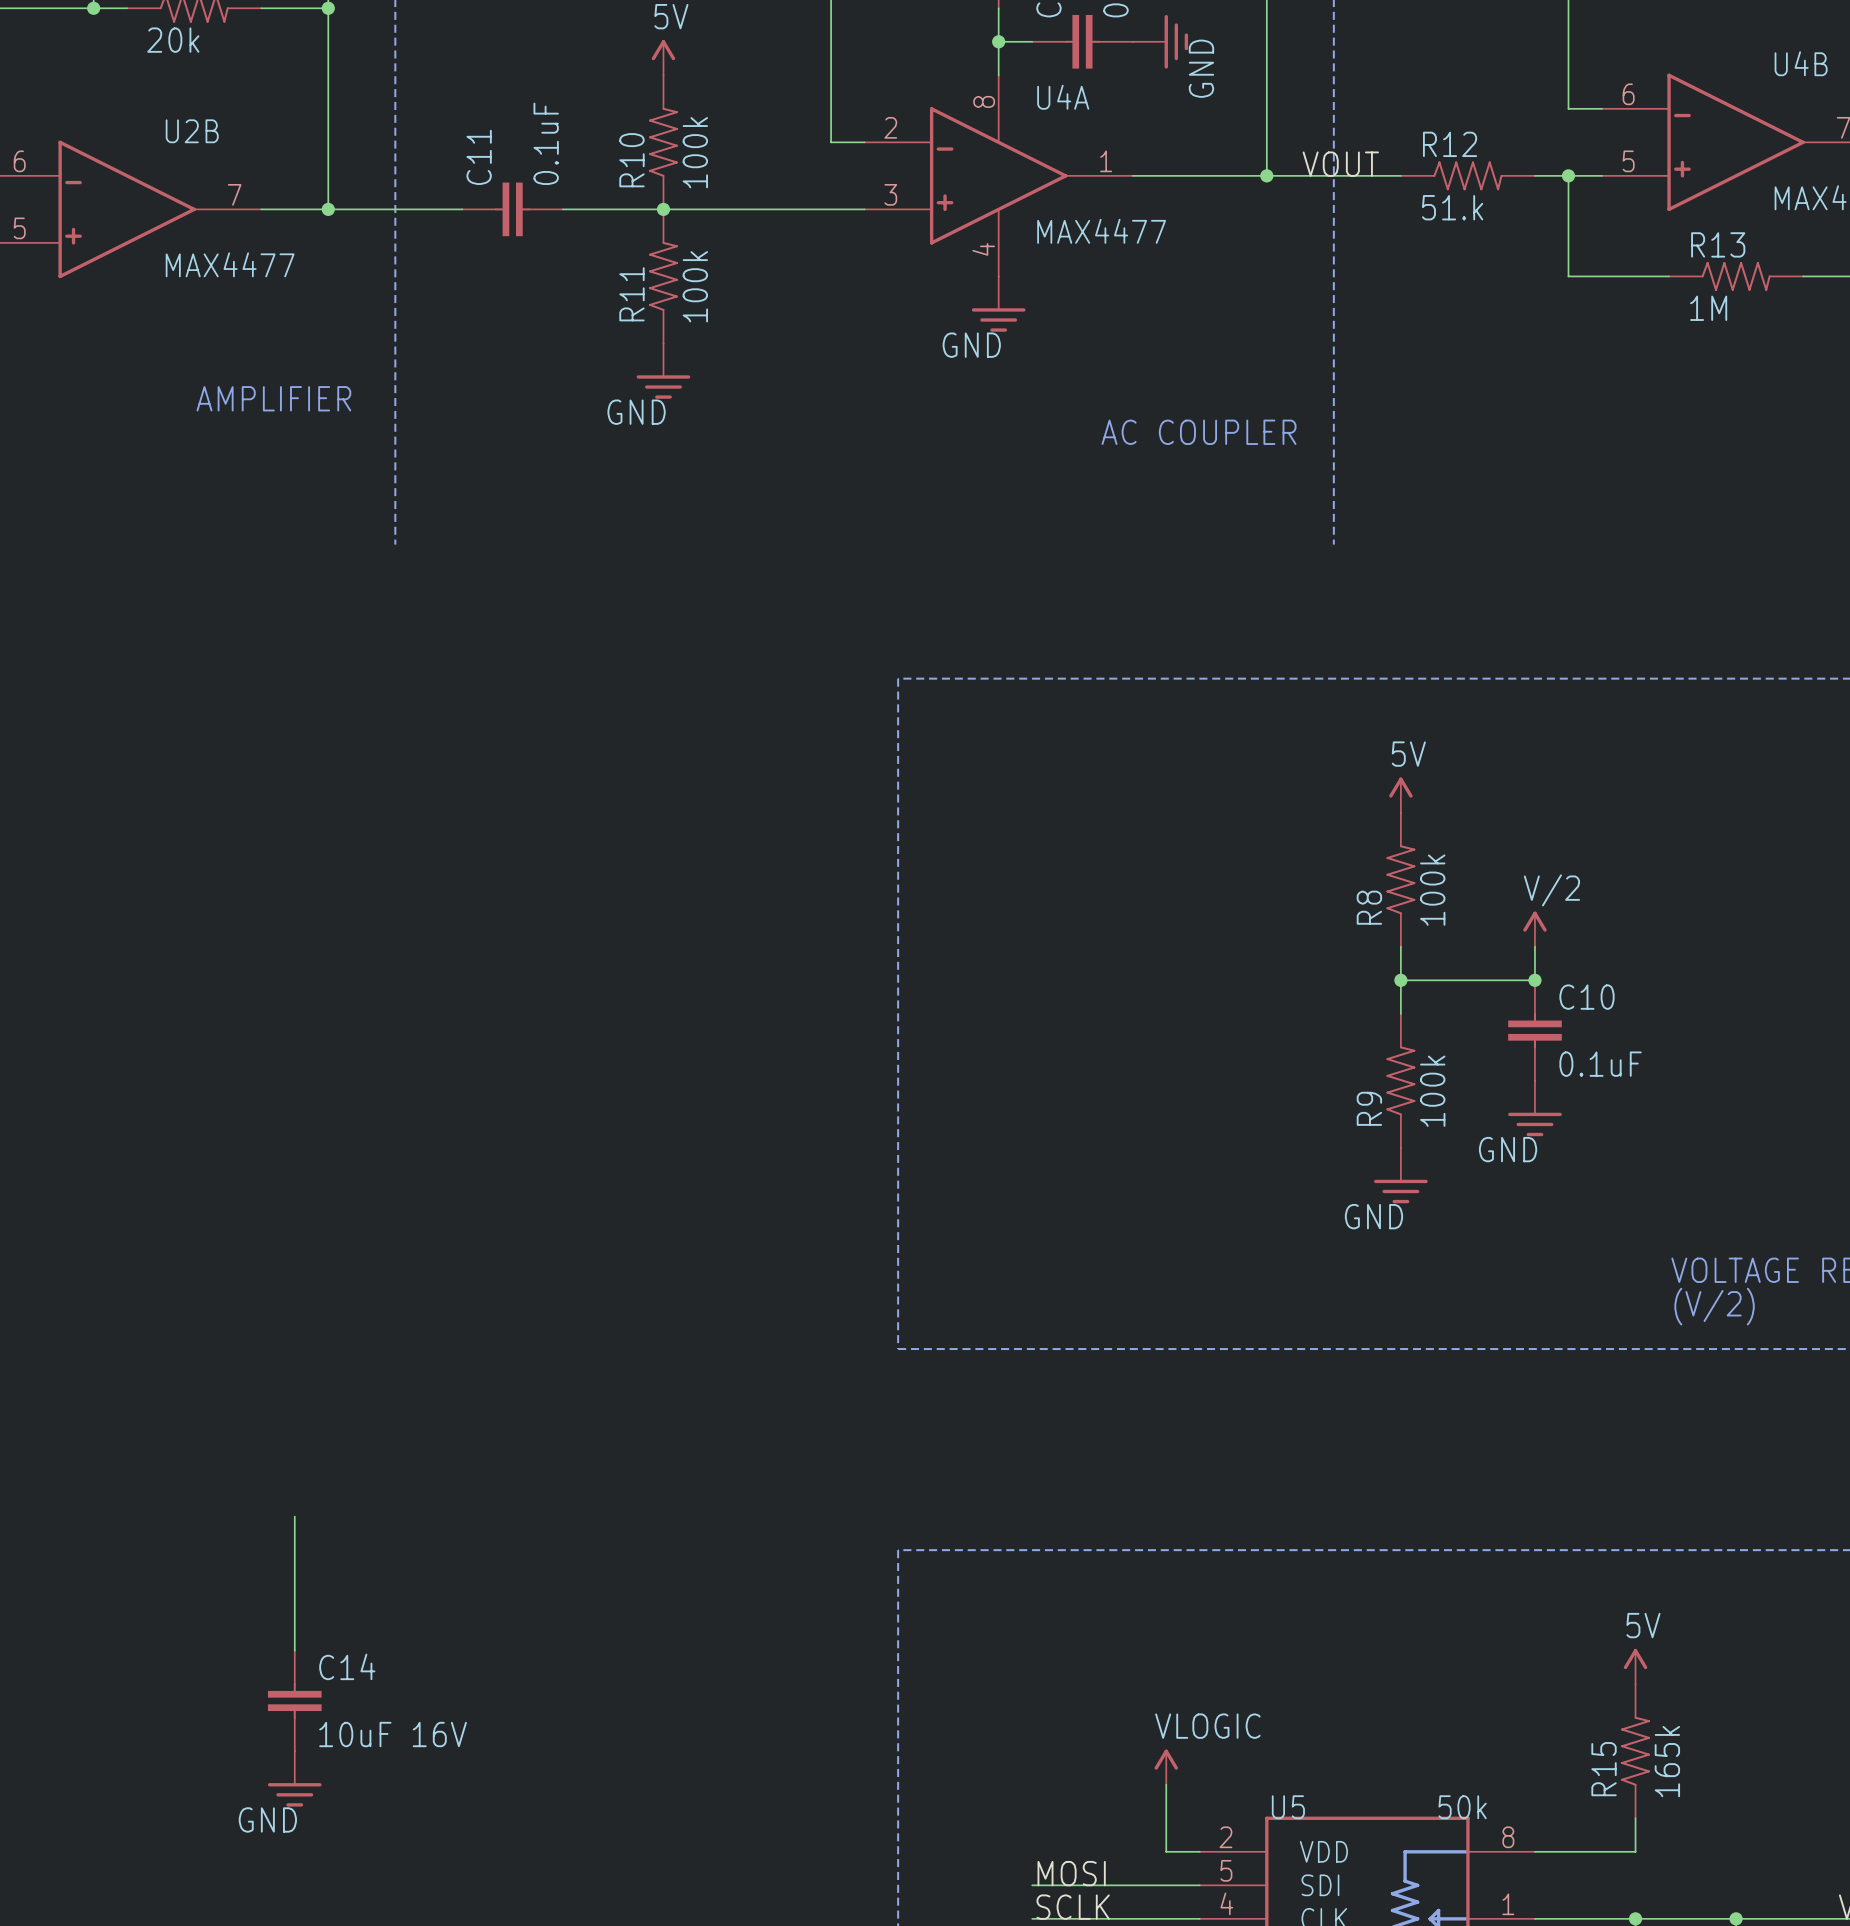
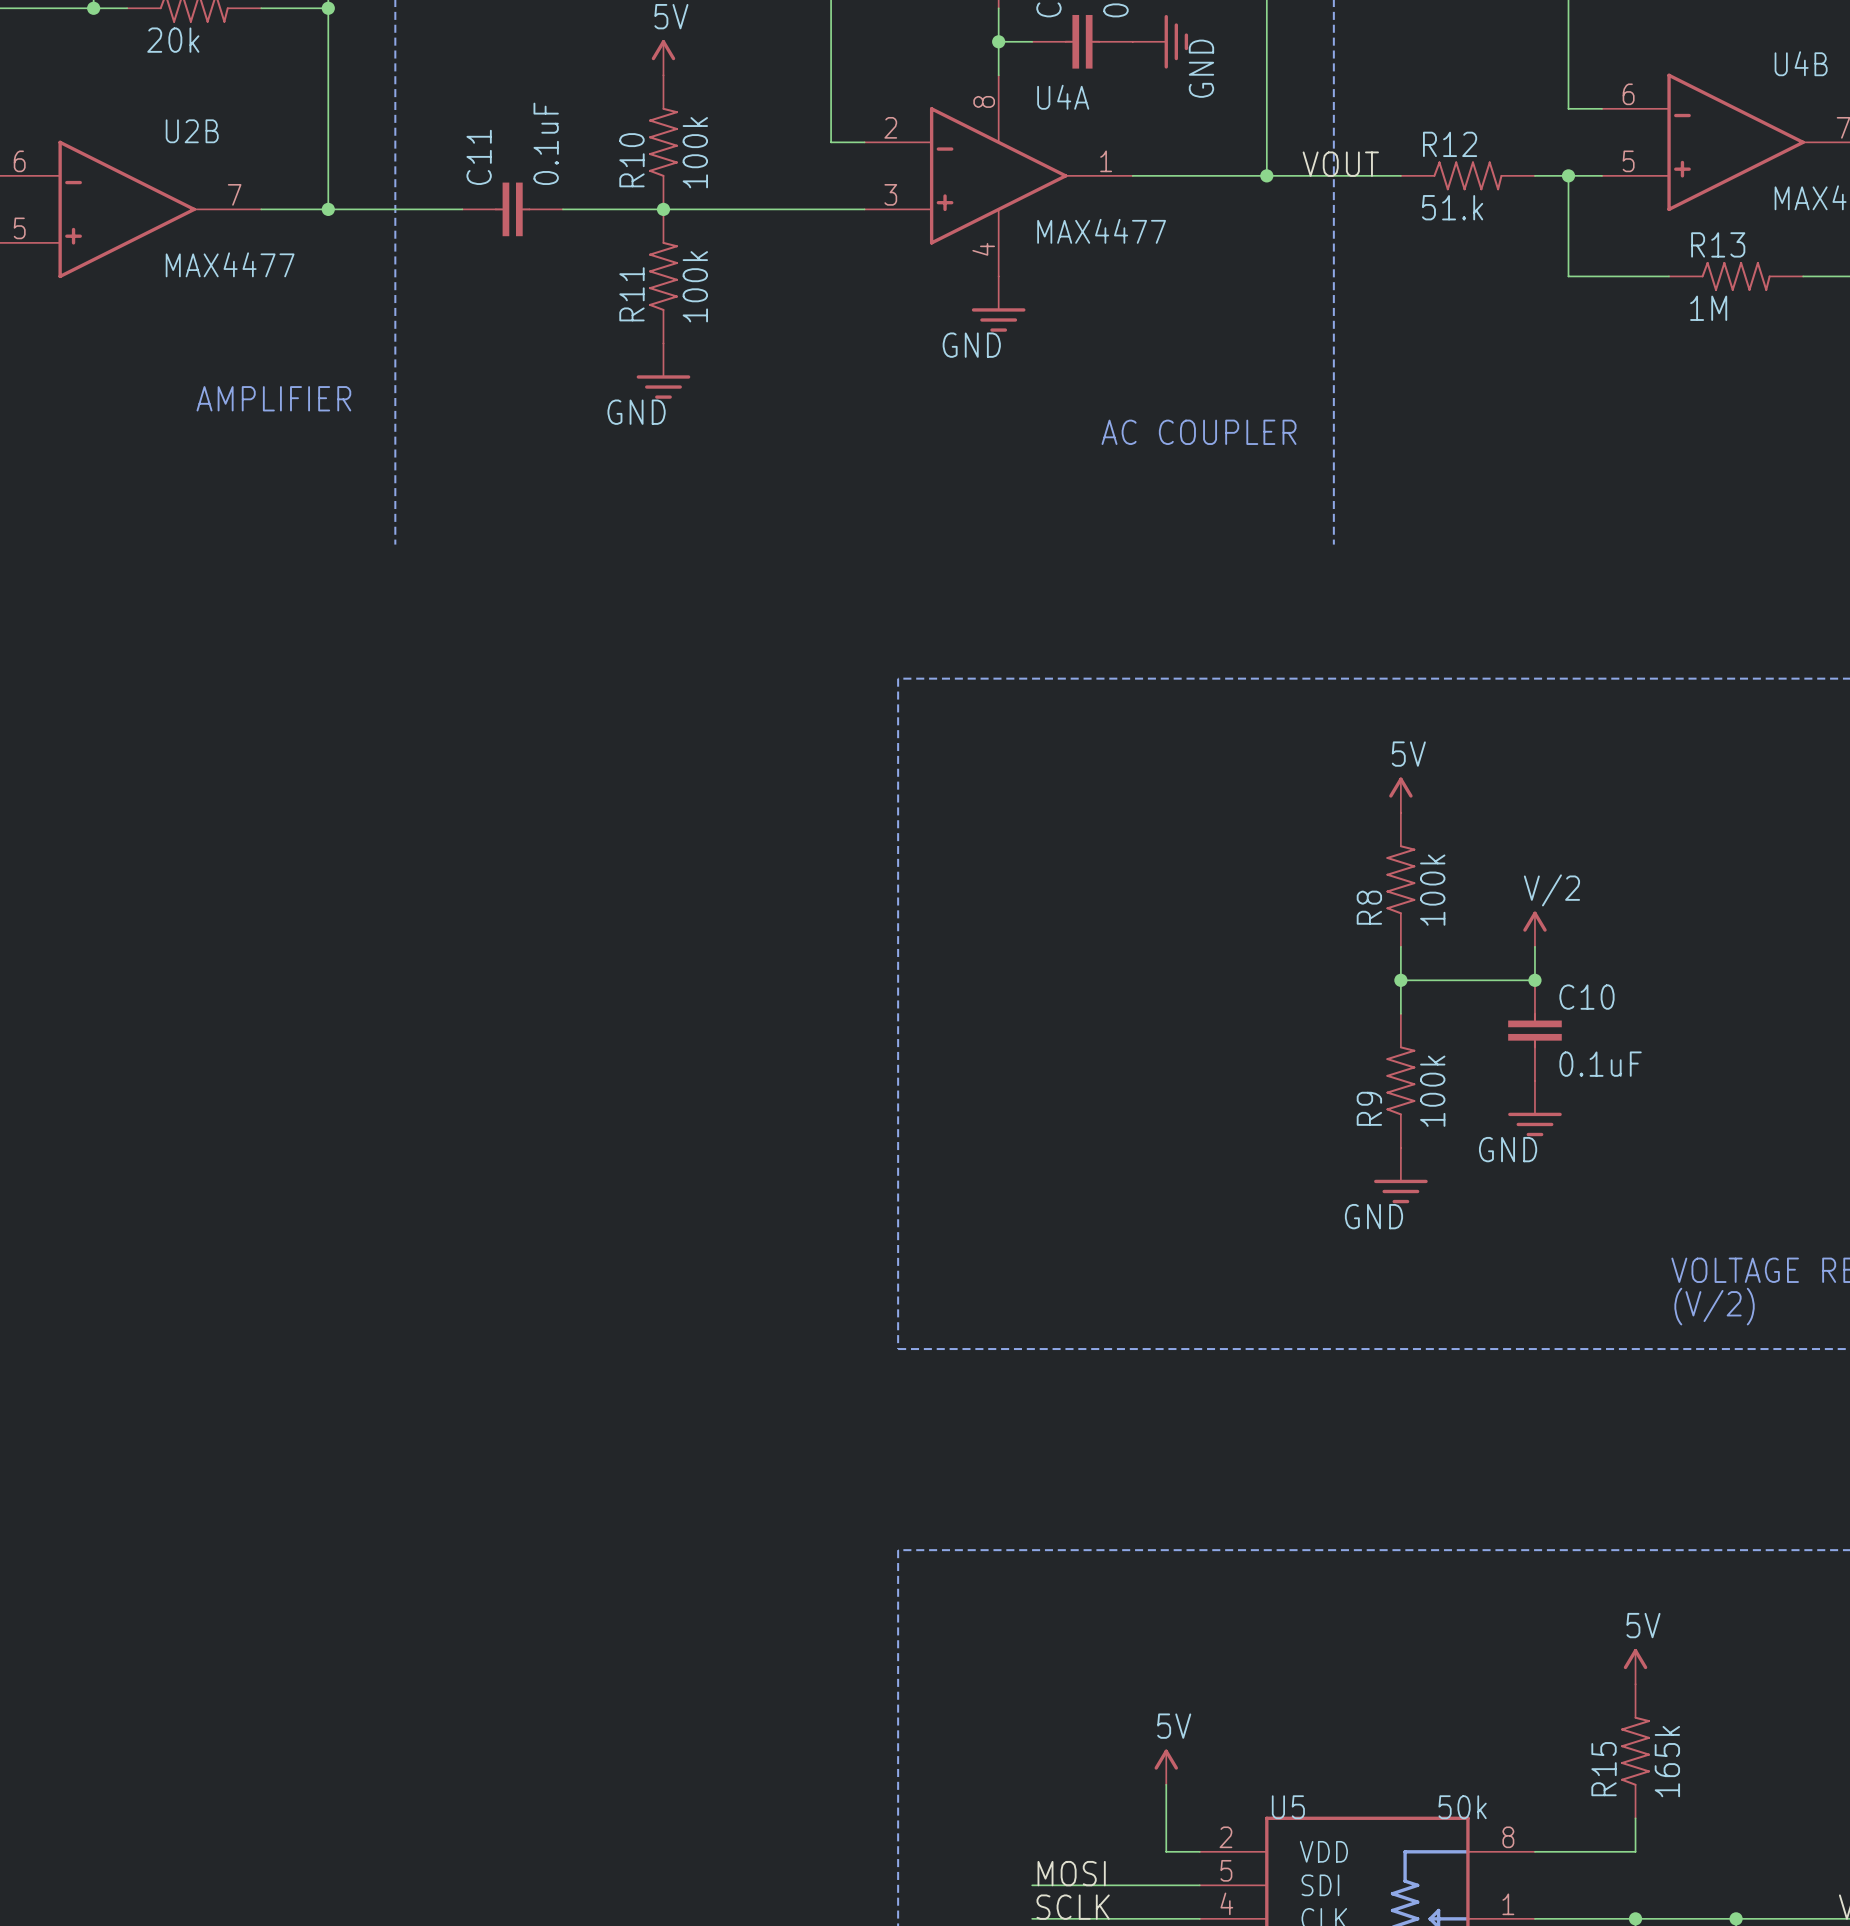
wire: (294, 1516) (294, 1650) -> none
C14: 10uF 16V (294, 1700) -> none
power symbol: VLOGIC (1166, 1767) -> 5V (1166, 1767)
power symbol: GND (294, 1778) -> none

